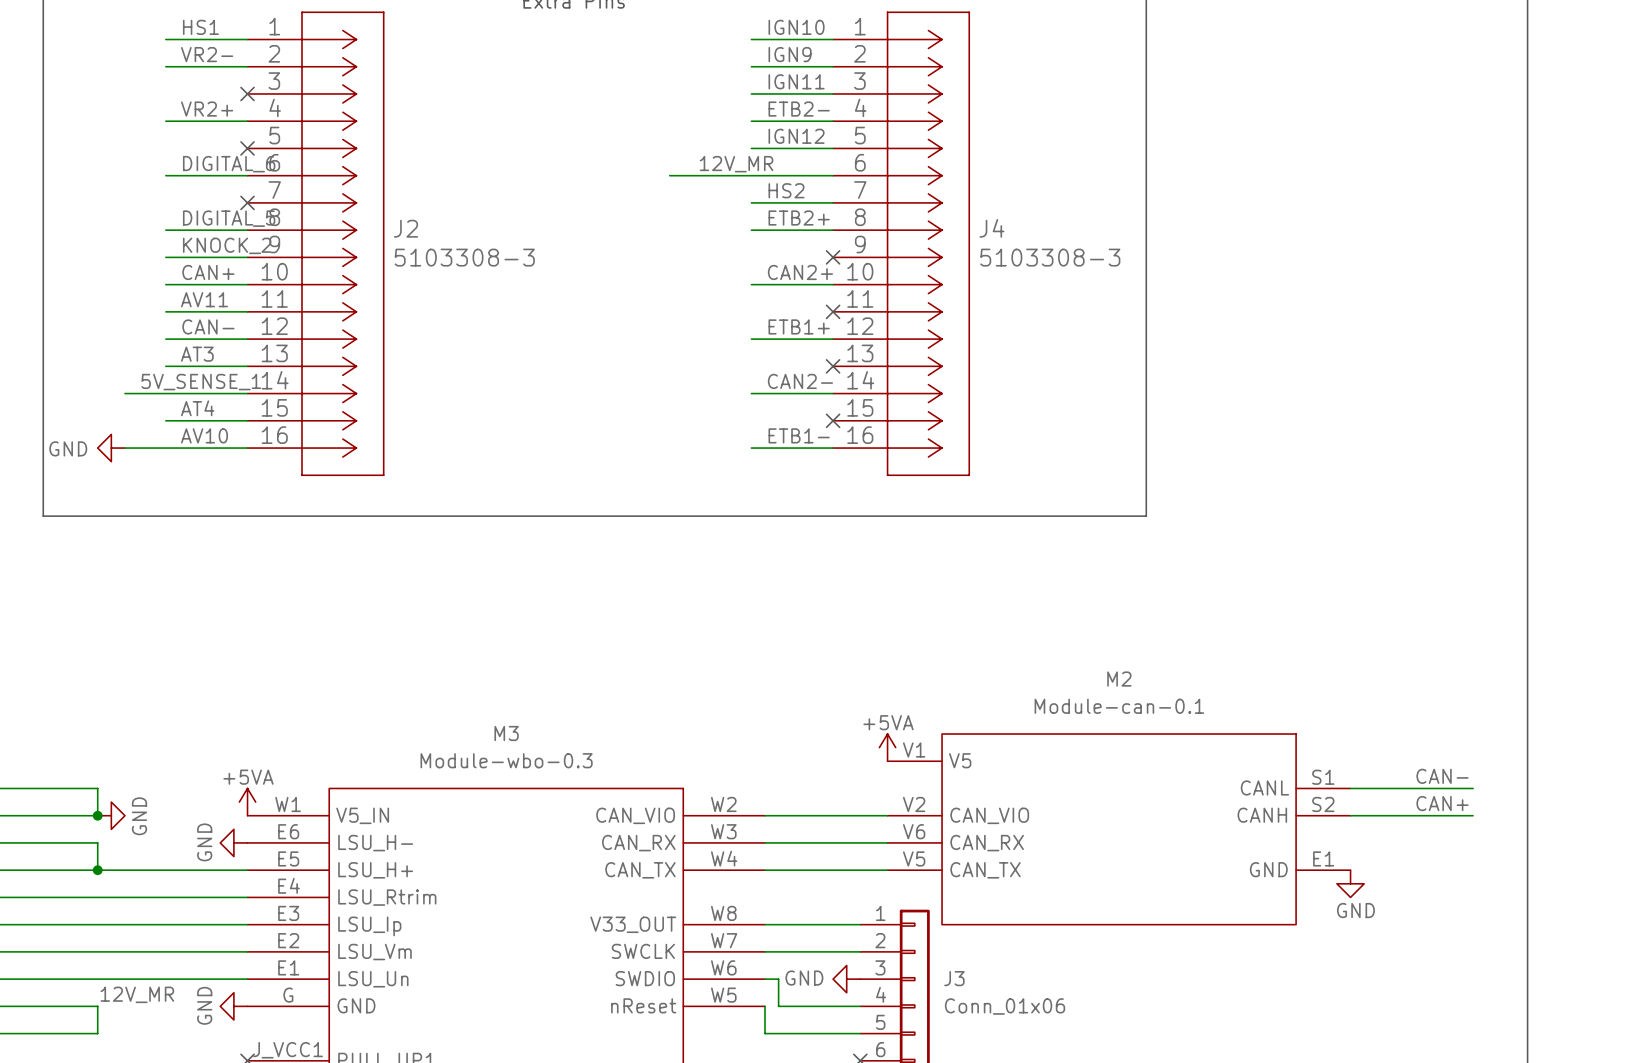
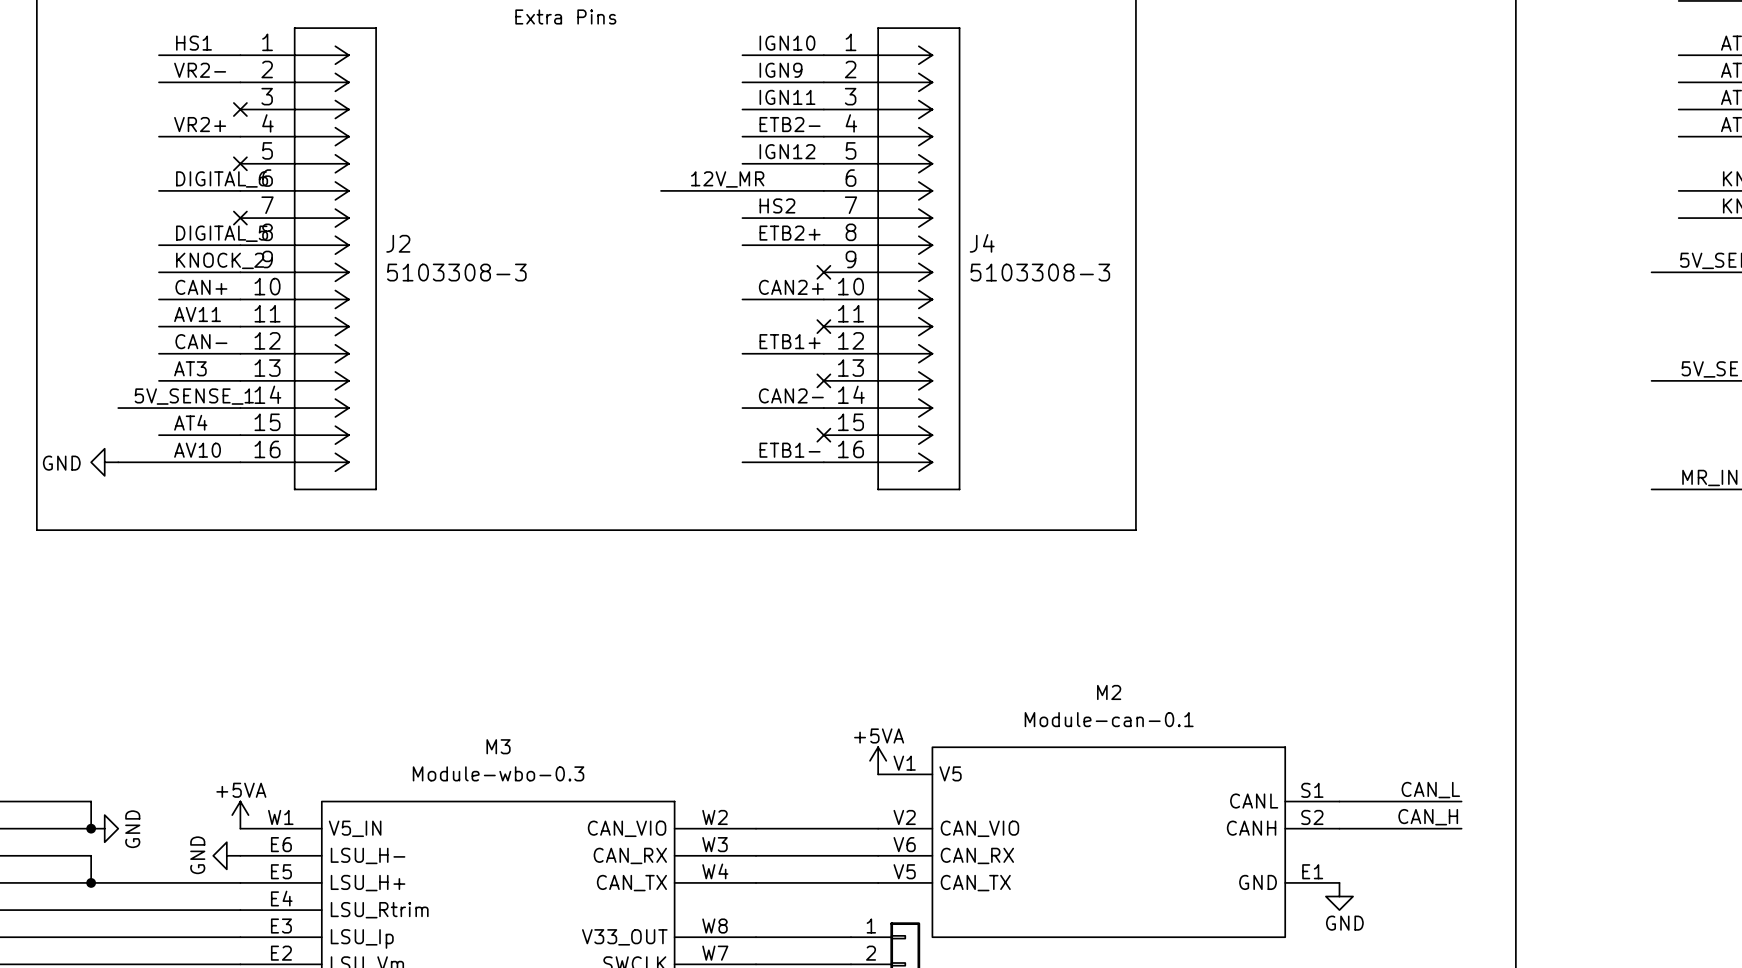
label: CAN- (1442, 776) -> none
label: none -> CAN_L (1430, 790)
label: CAN+ (1442, 803) -> none
label: none -> CAN_H (1428, 817)

